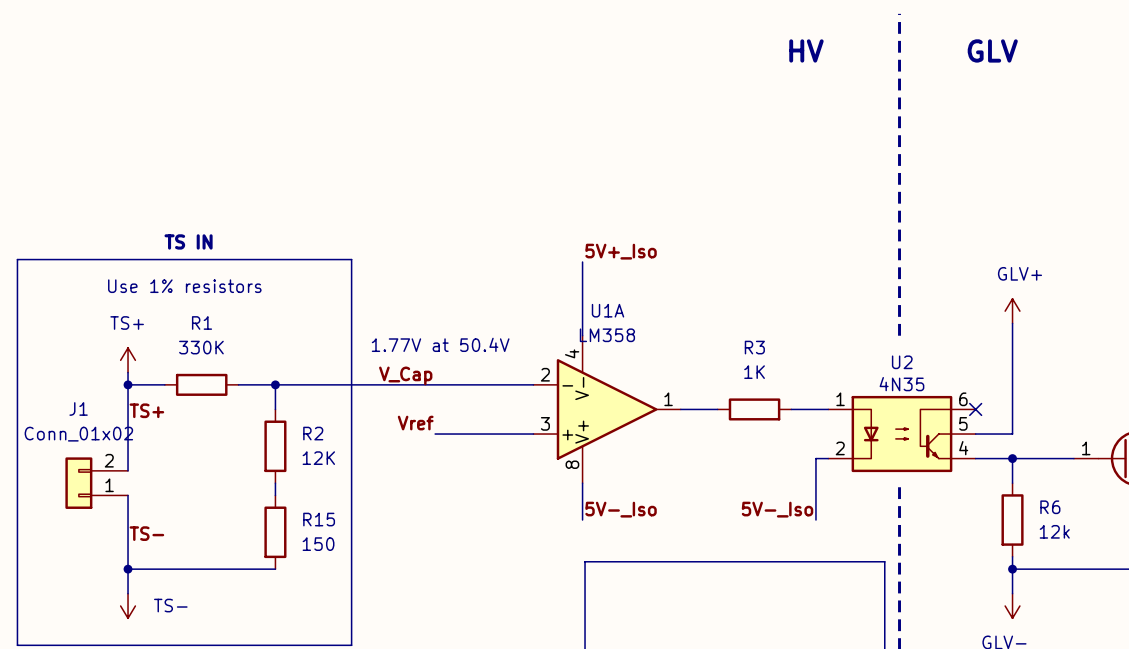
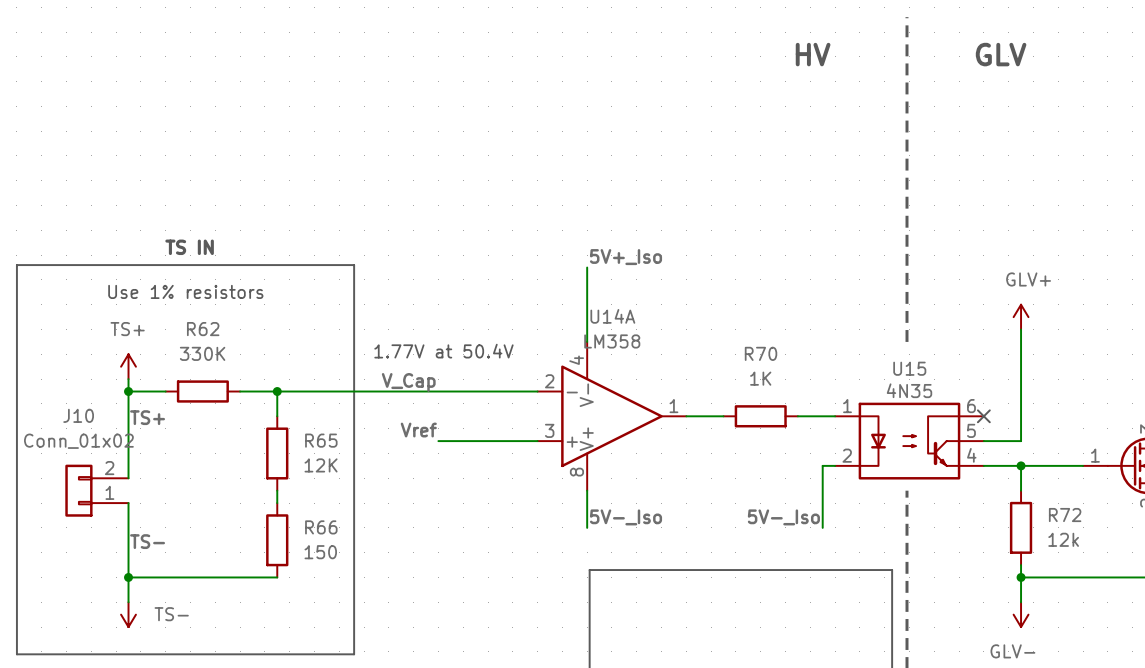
U1A name: U1A (608, 310) -> U14A (612, 316)
R1 name: R1 (202, 322) -> R62 (203, 329)
R3 name: R3 (754, 347) -> R70 (761, 353)
U2 name: U2 (902, 362) -> U15 (909, 368)
J1 name: J1 (78, 408) -> J10 (78, 415)
R2 name: R2 (313, 433) -> R65 (321, 440)
R6 name: R6 (1050, 507) -> R72 (1065, 515)
R15 name: R15 (319, 519) -> R66 (321, 527)

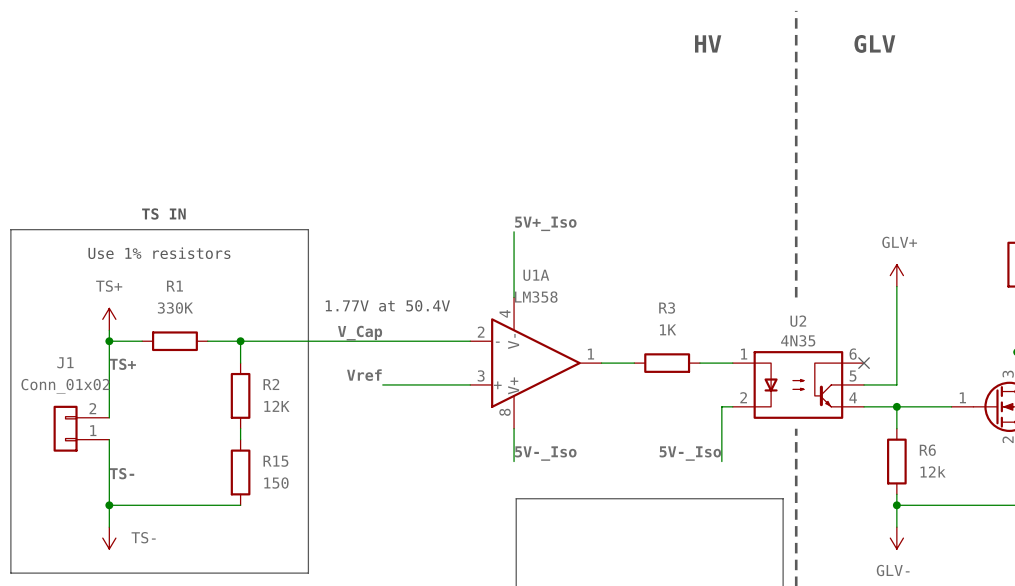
U14A name: U14A (612, 316) -> U1A (536, 275)
R62 name: R62 (203, 329) -> R1 (174, 286)
R70 name: R70 (761, 353) -> R3 (667, 308)
U15 name: U15 (909, 368) -> U2 (798, 321)
J10 name: J10 (78, 415) -> J1 (65, 362)
R65 name: R65 (321, 440) -> R2 (271, 384)
R72 name: R72 (1065, 515) -> R6 (927, 450)
R66 name: R66 (321, 527) -> R15 (275, 461)

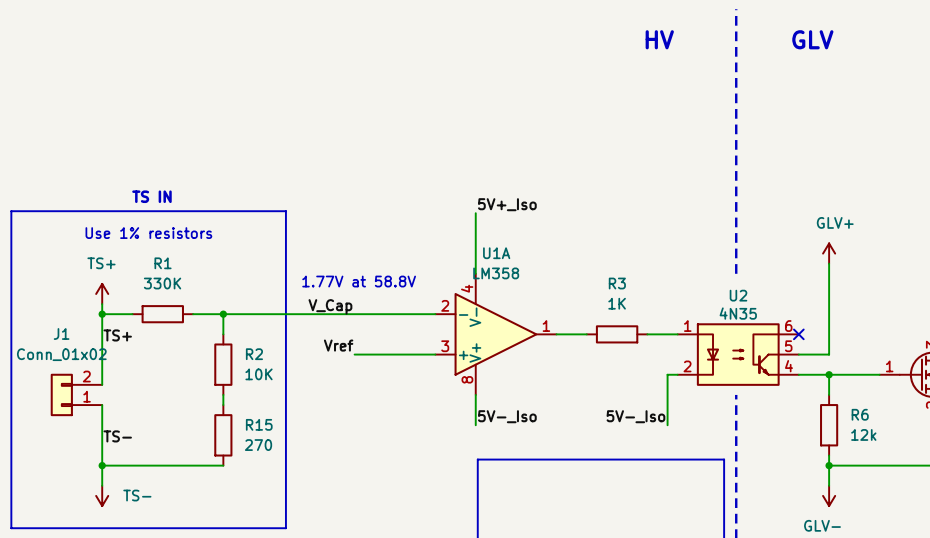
text: 1.77V at 50.4V (387, 305) -> 1.77V at 58.8V (359, 281)
R2 value: 12K (276, 406) -> 10K (259, 374)
R15 value: 150 (276, 483) -> 270 (258, 445)

